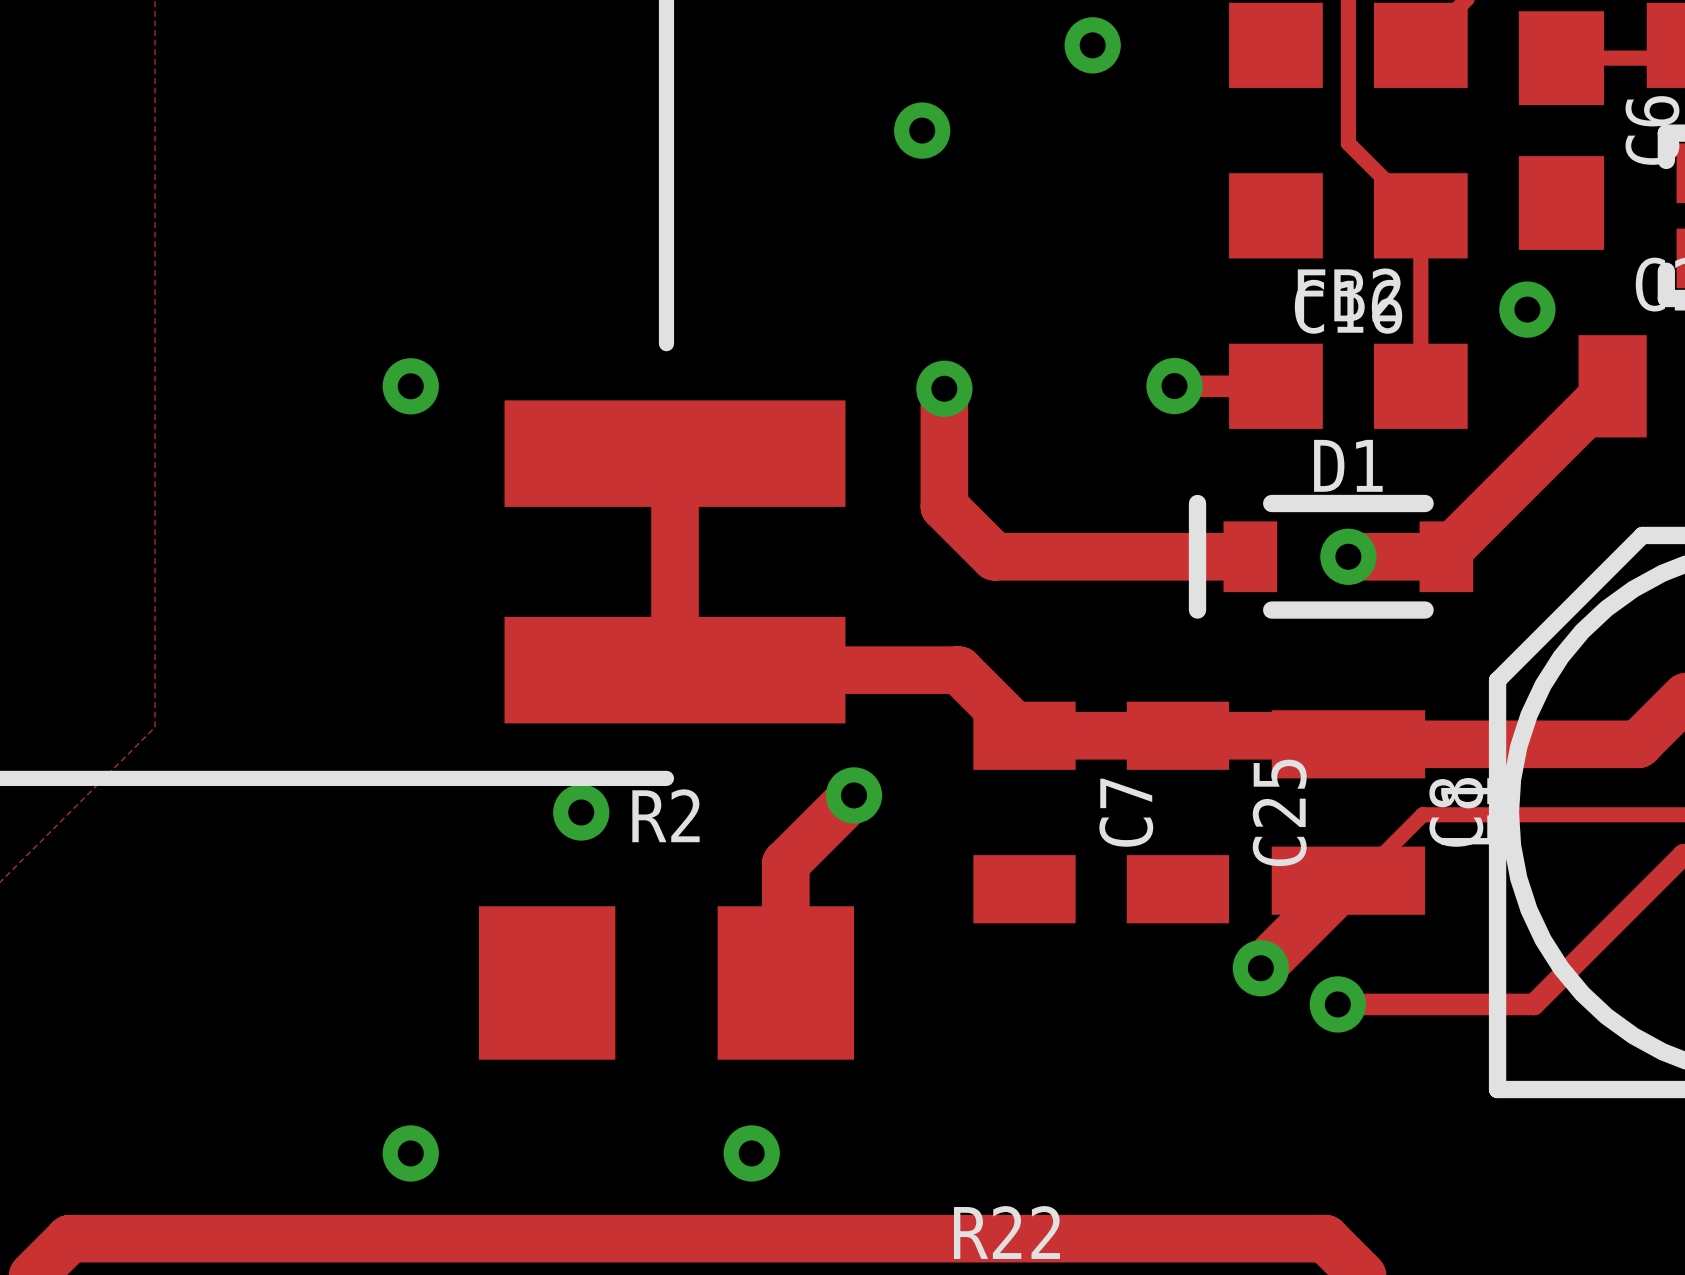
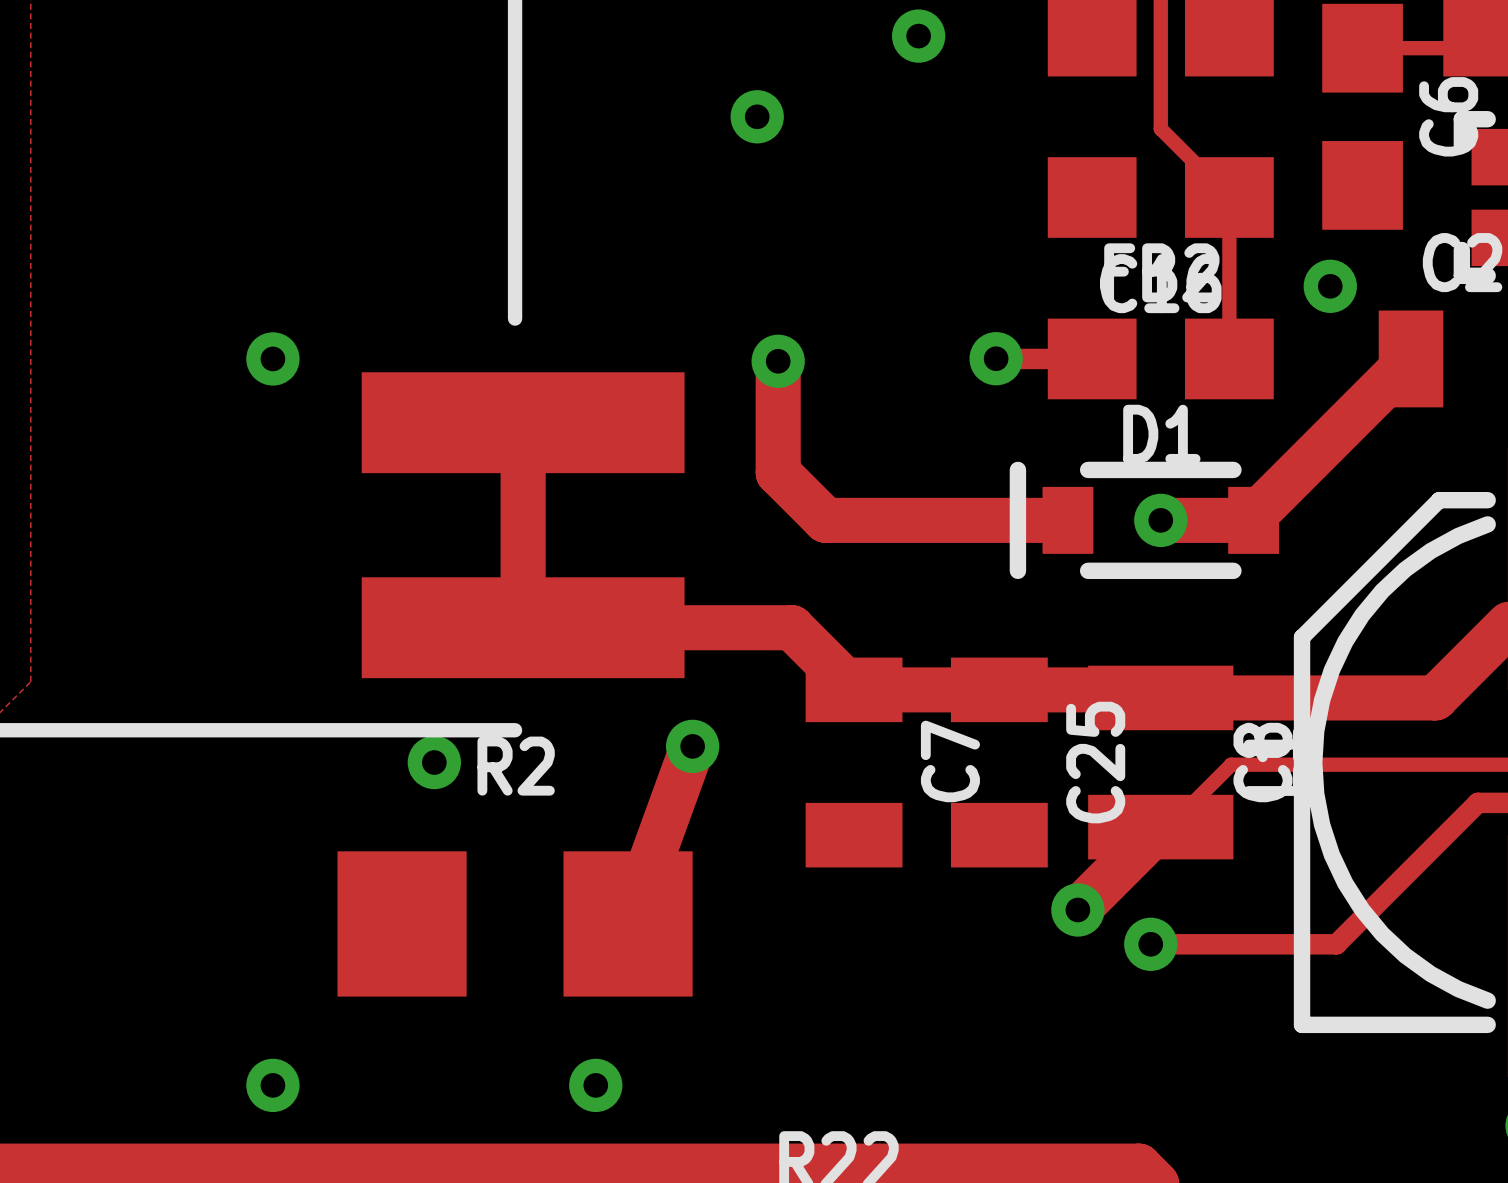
track: (854, 795) (785, 863) (785, 982) -> (692, 746) (628, 923)

